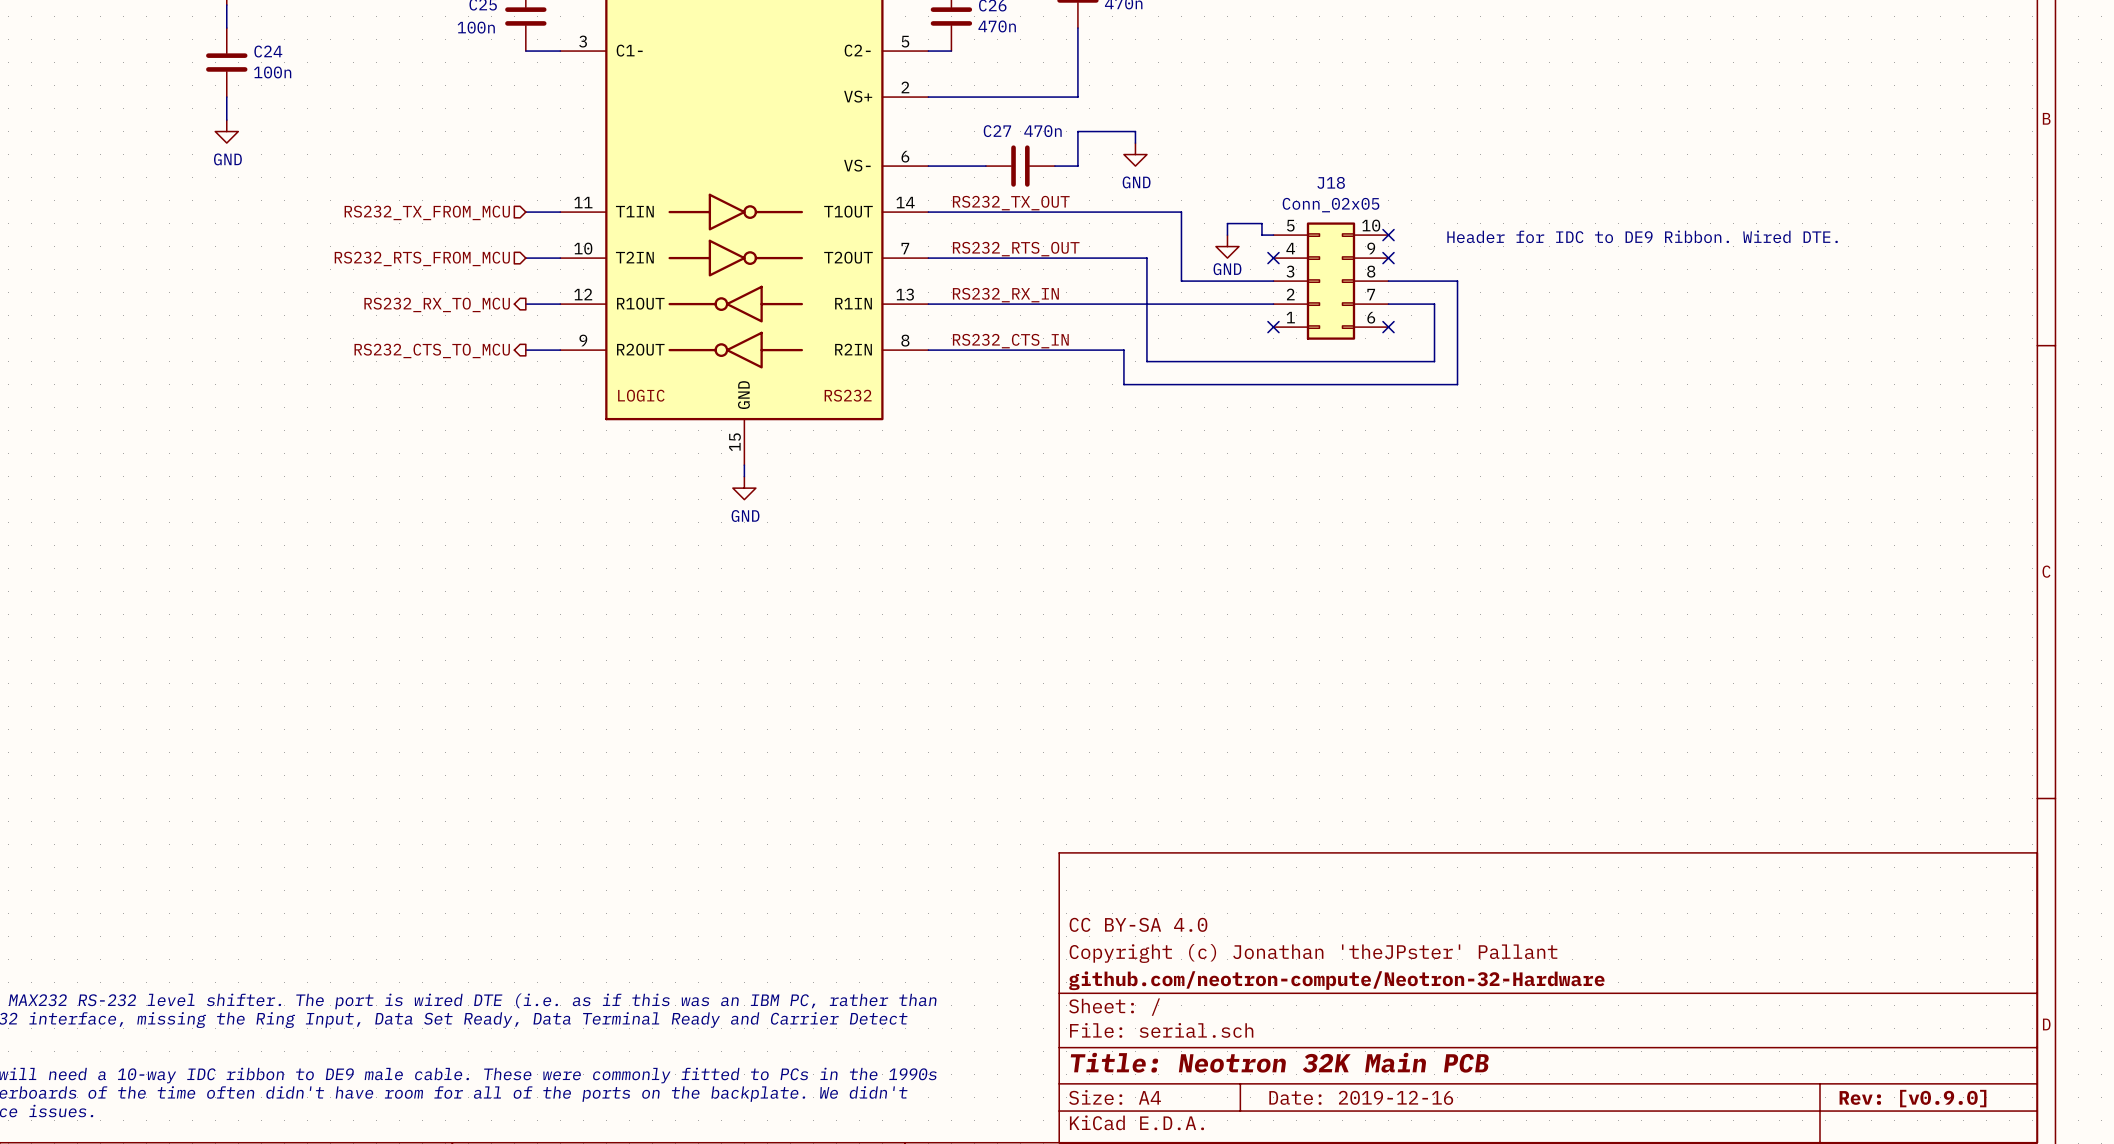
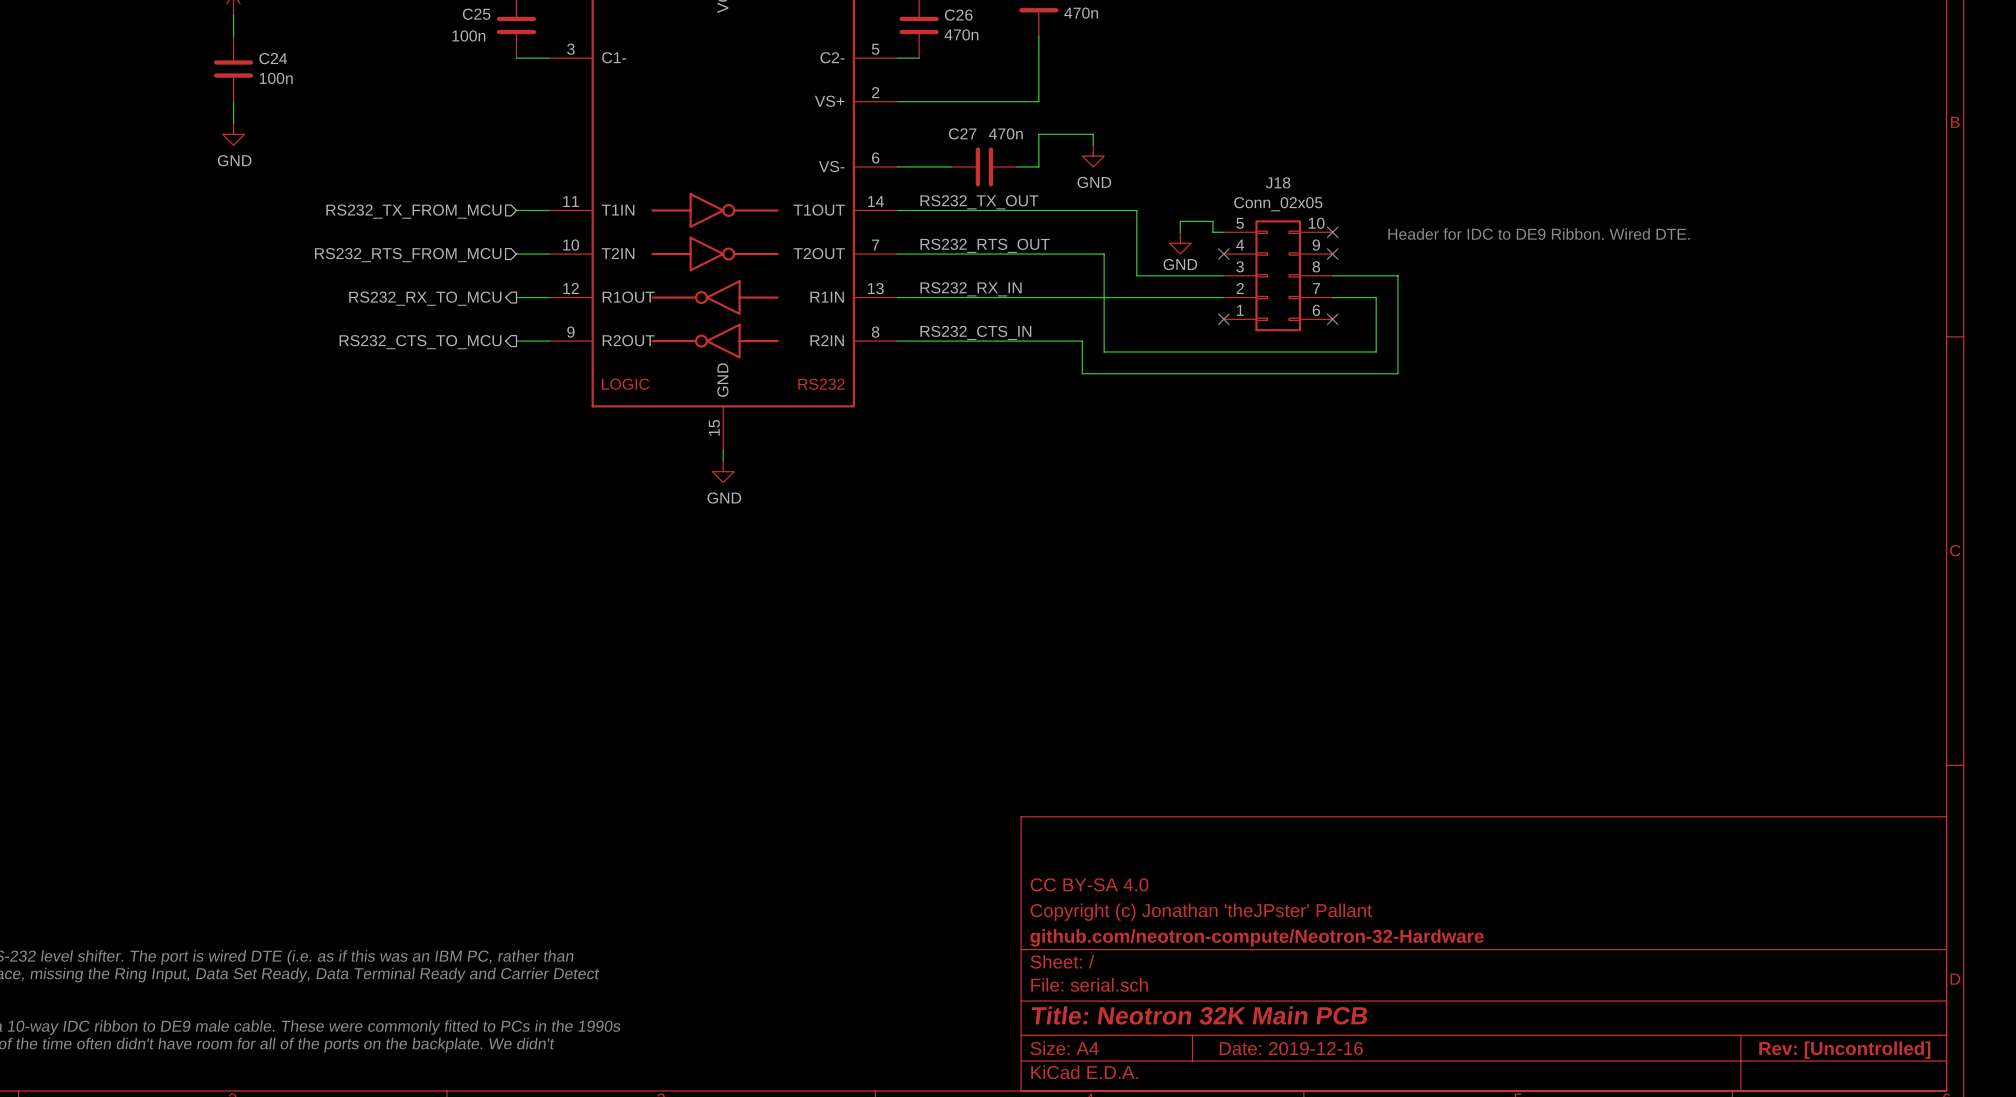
title block: Rev: [v0.9.0] (1912, 1098) -> Rev: [Uncontrolled] (1844, 1050)

